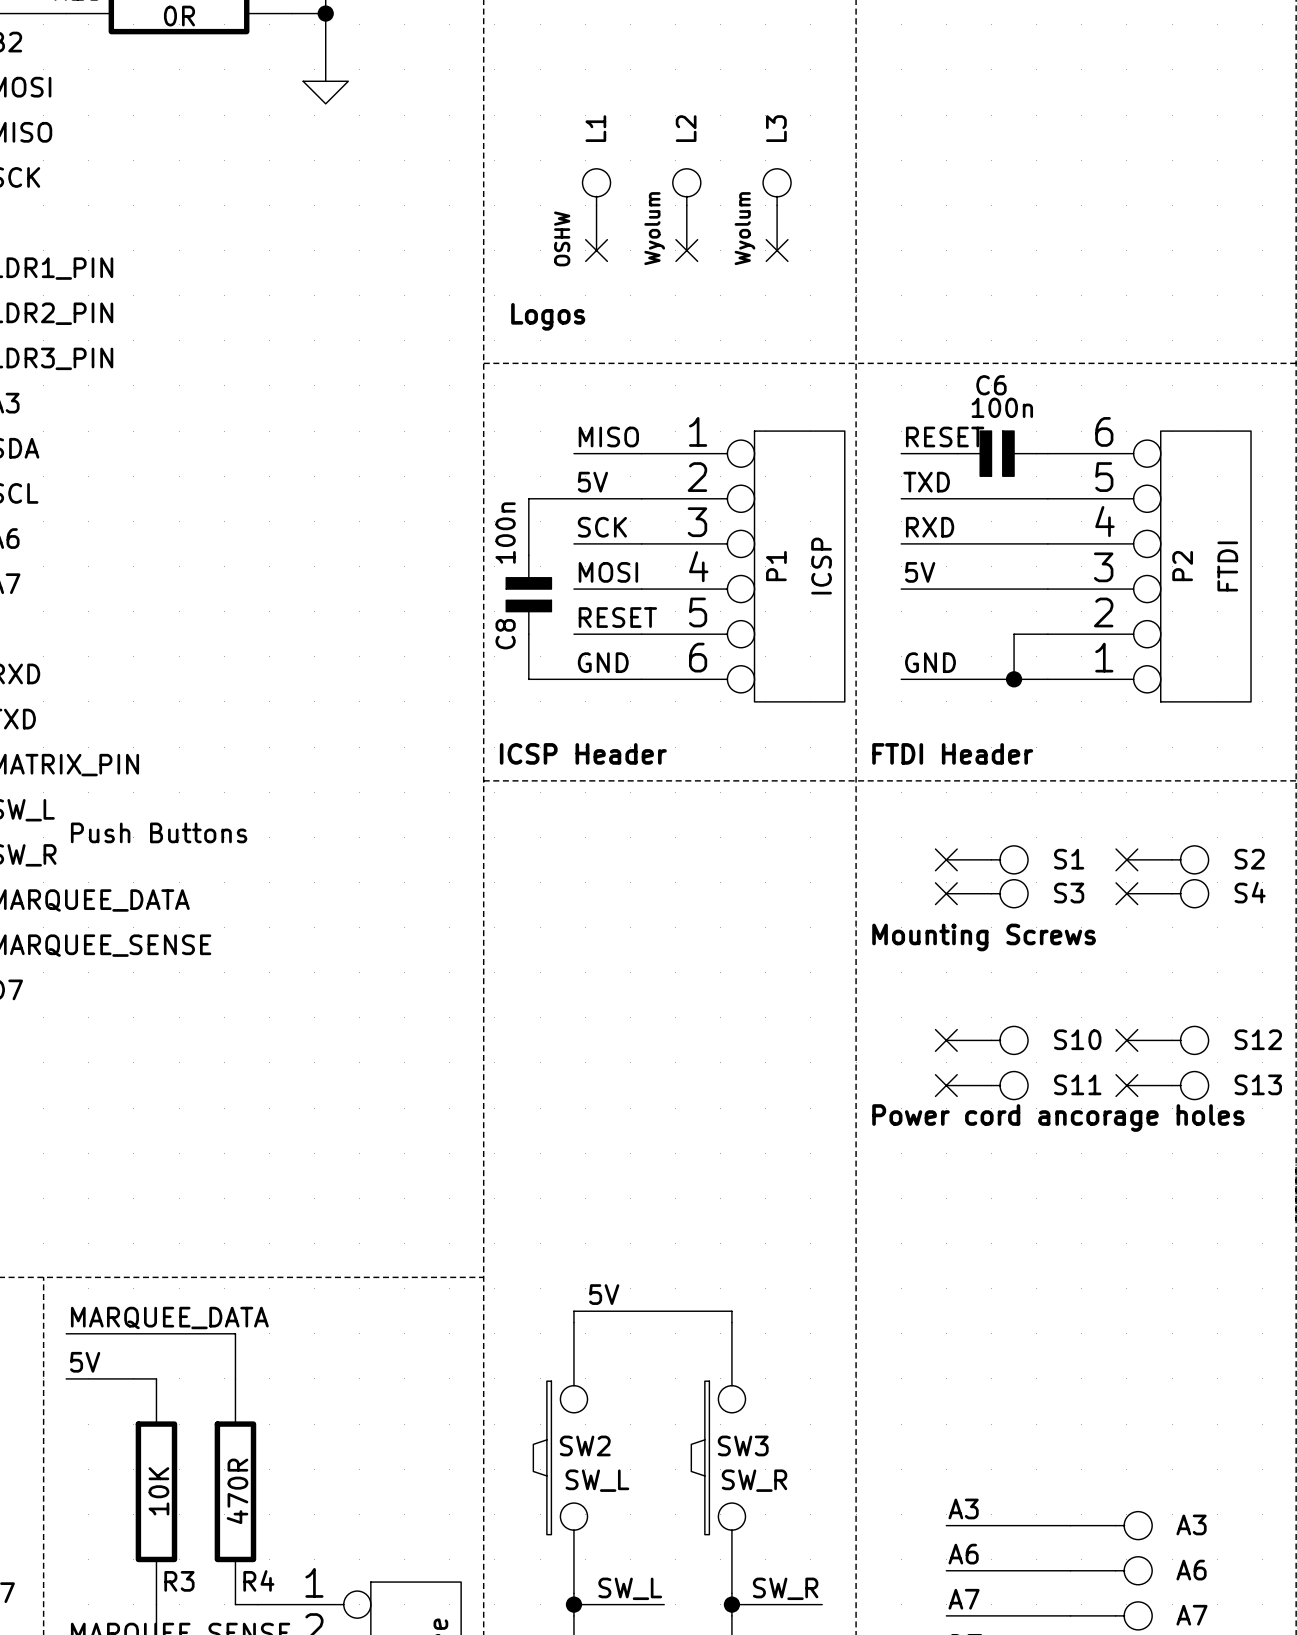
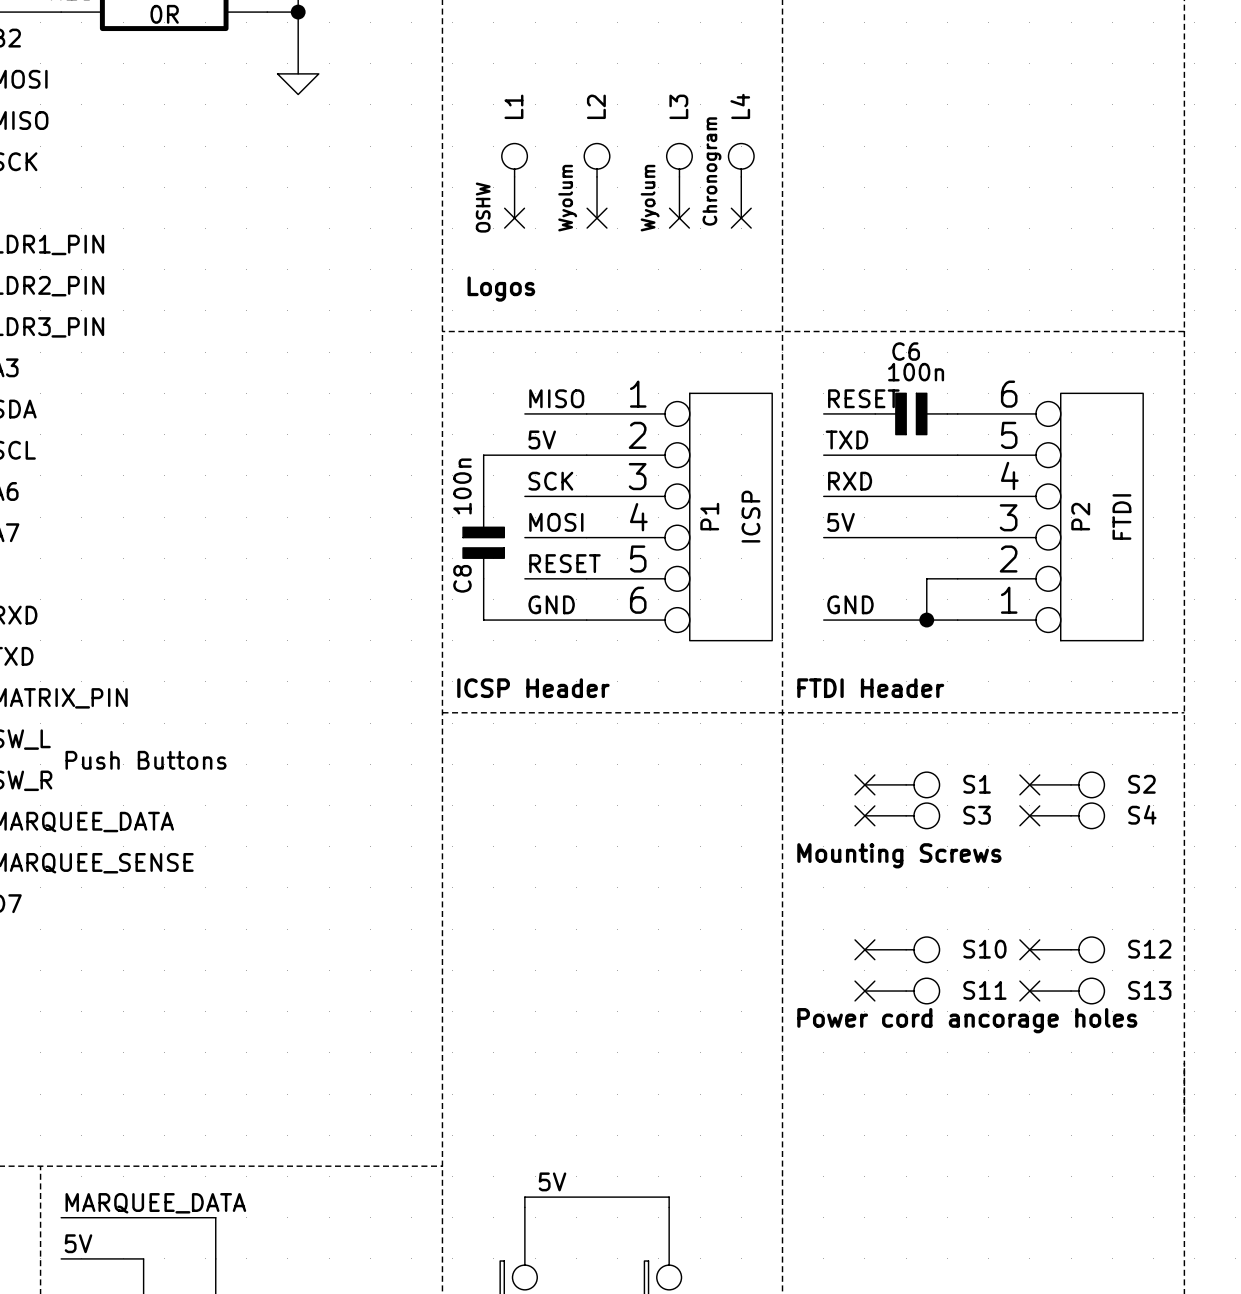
L4: none -> Chronogram (741, 180)
L1 position: (596, 209) -> (514, 180)
L2 position: (686, 209) -> (597, 180)
L3 position: (777, 209) -> (679, 180)
no-connect mark: none -> (514, 218)
no-connect mark: none -> (597, 218)
no-connect mark: none -> (679, 218)
no-connect mark: none -> (741, 218)
no-connect mark: (596, 250) -> none
no-connect mark: (686, 250) -> none
no-connect mark: (777, 250) -> none

